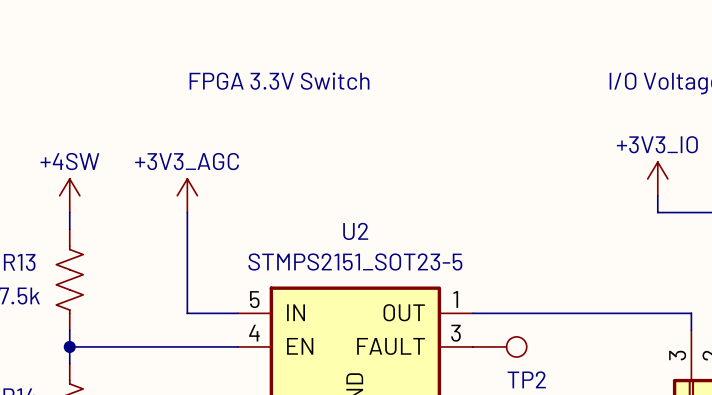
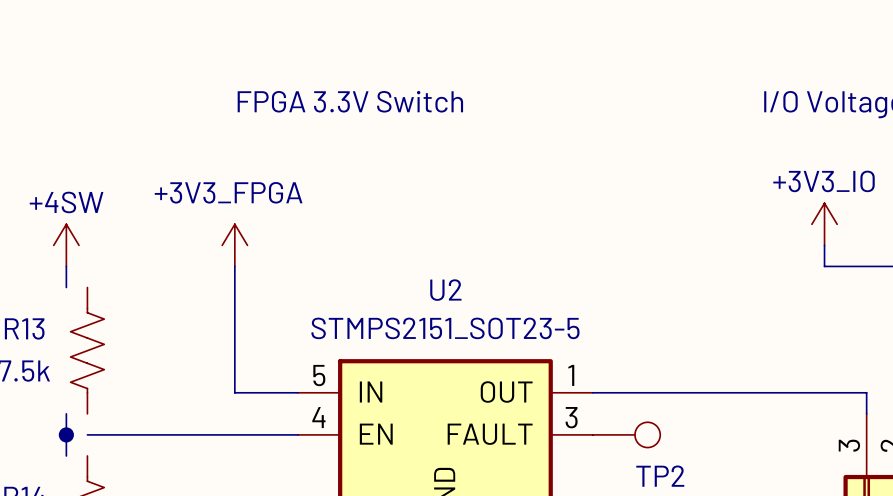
power symbol position: +4SW (69, 195) -> +4SW (66, 245)
power symbol: +3V3_AGC (187, 195) -> +3V3_FPGA (234, 245)
wire: (69, 212) (69, 229) -> (66, 266) (66, 287)
wire: (69, 330) (69, 363) -> (66, 413) (66, 455)
junction position: (69, 346) -> (66, 434)

